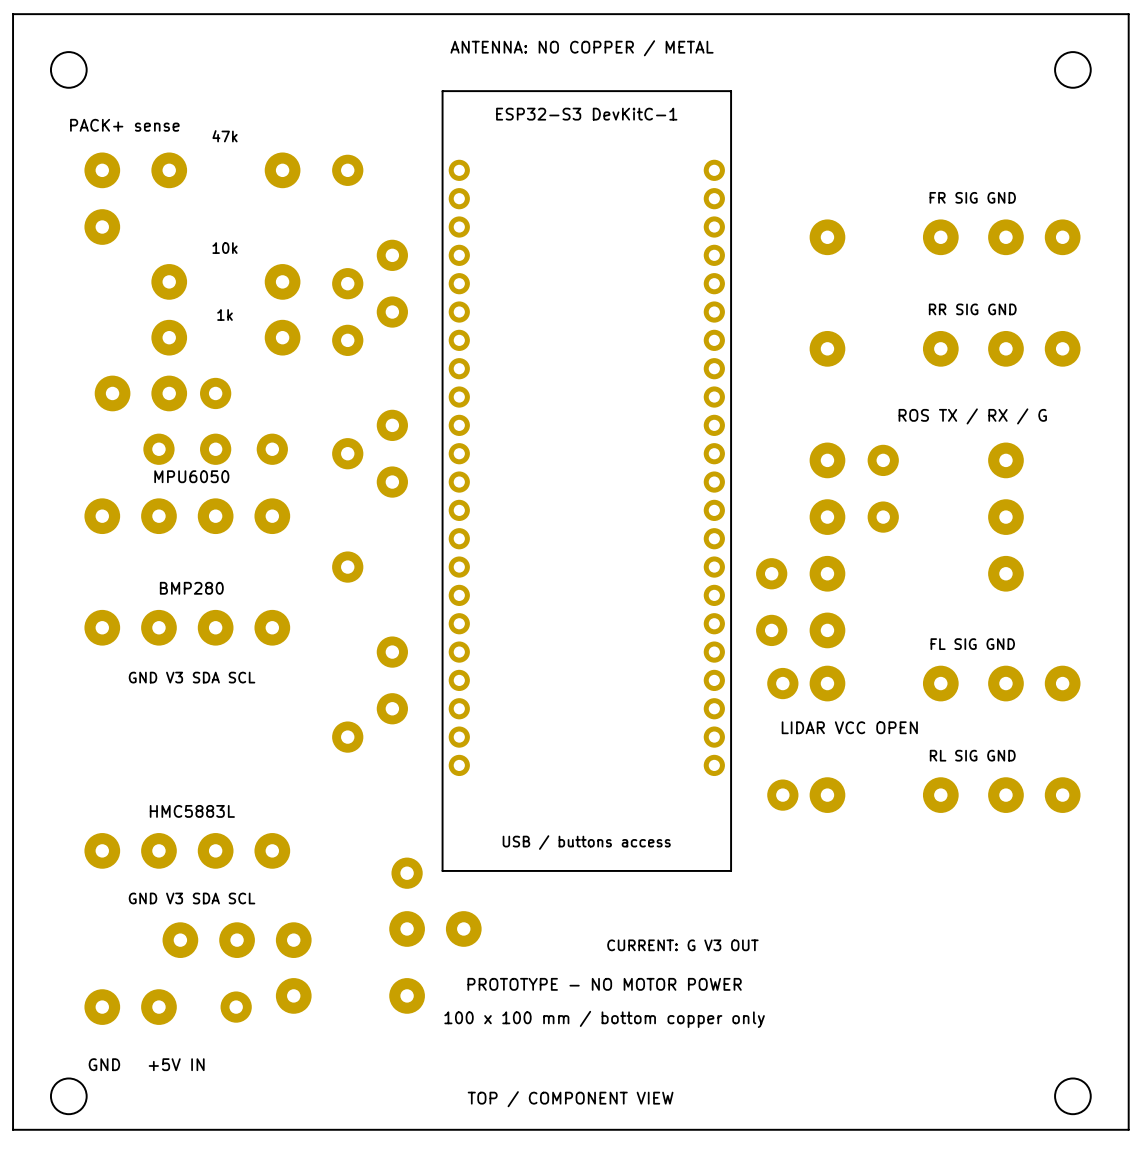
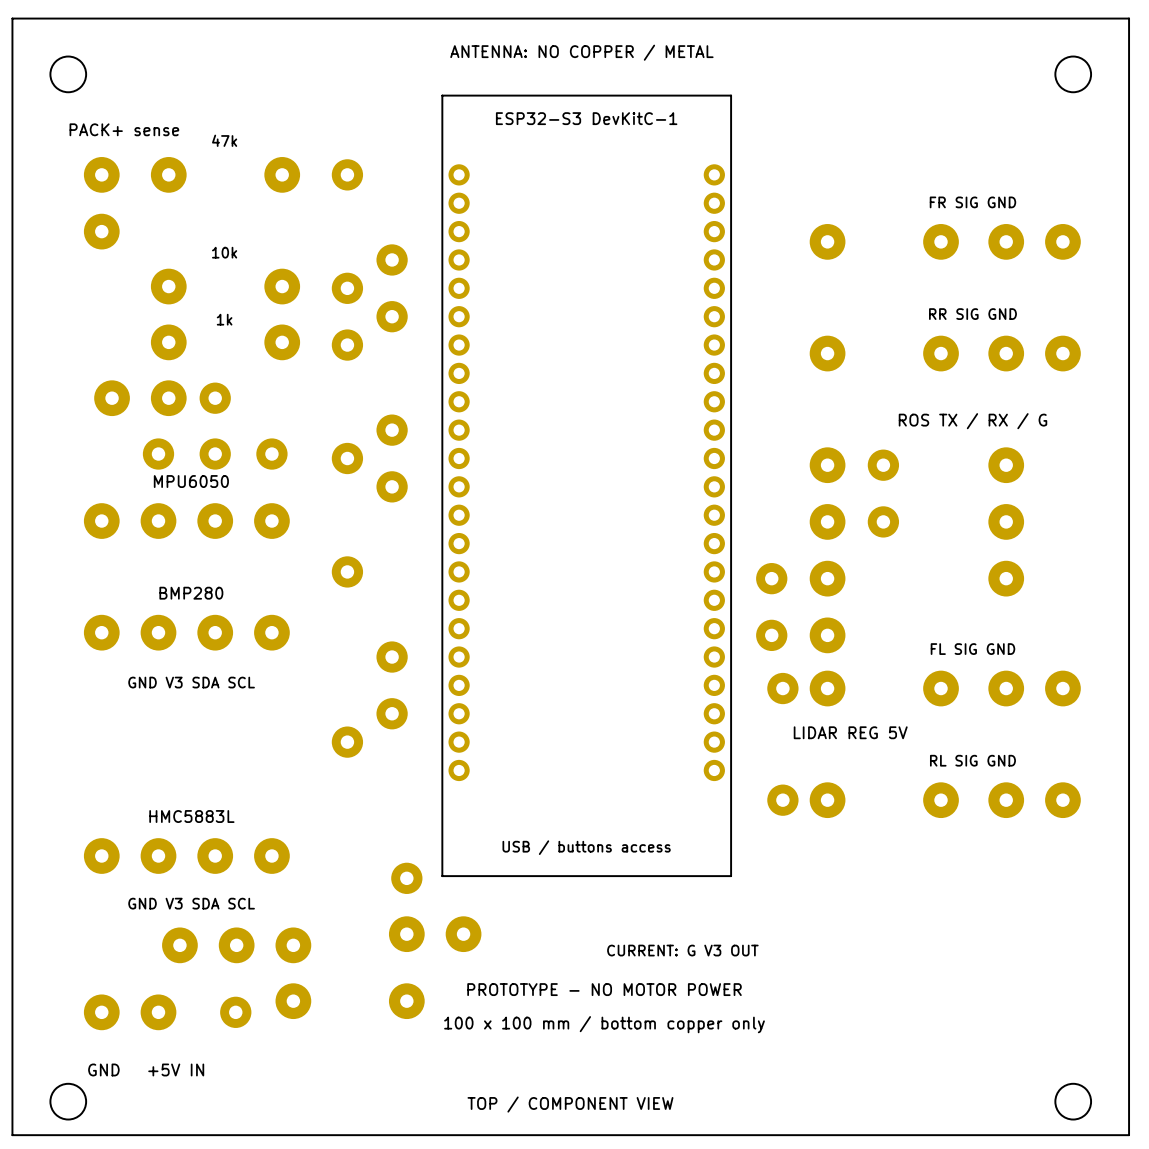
text: LIDAR VCC OPEN (849, 727) -> LIDAR REG 5V (850, 732)

